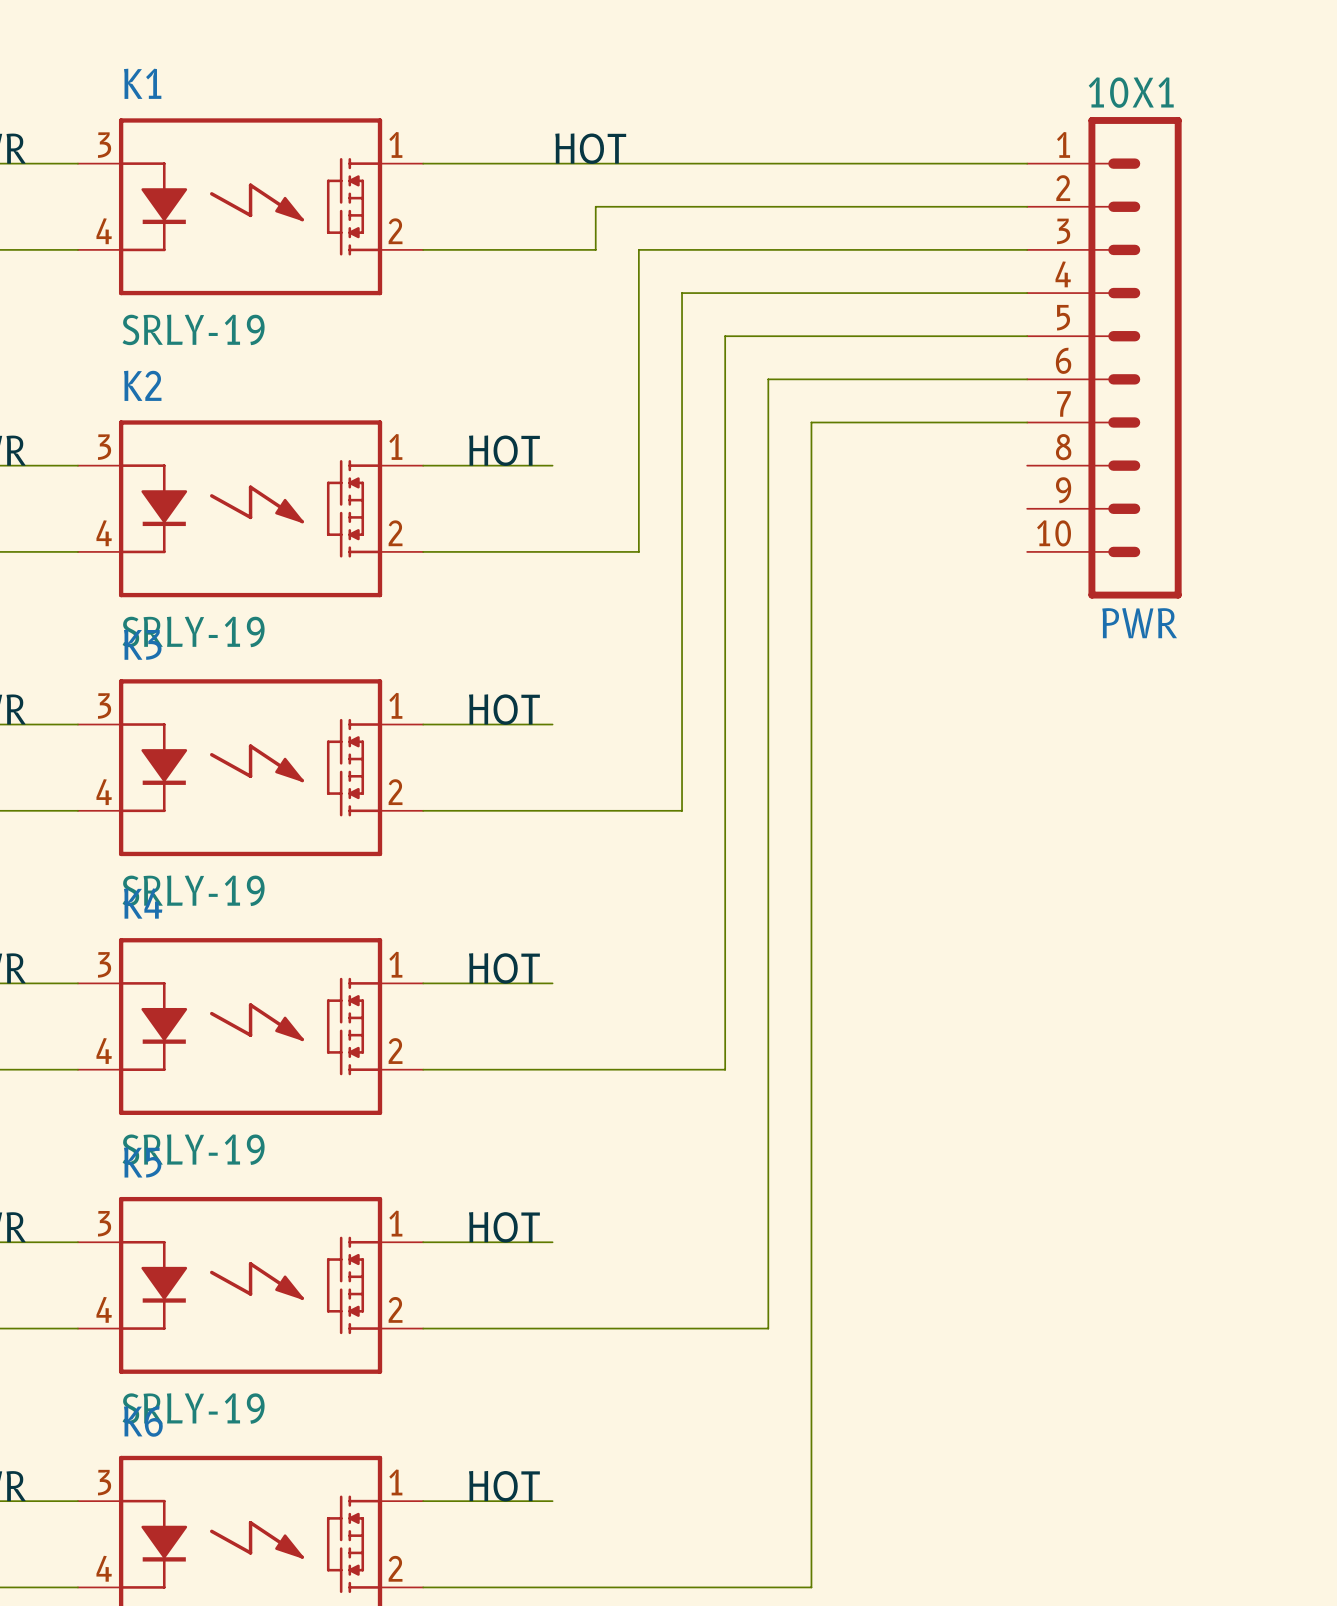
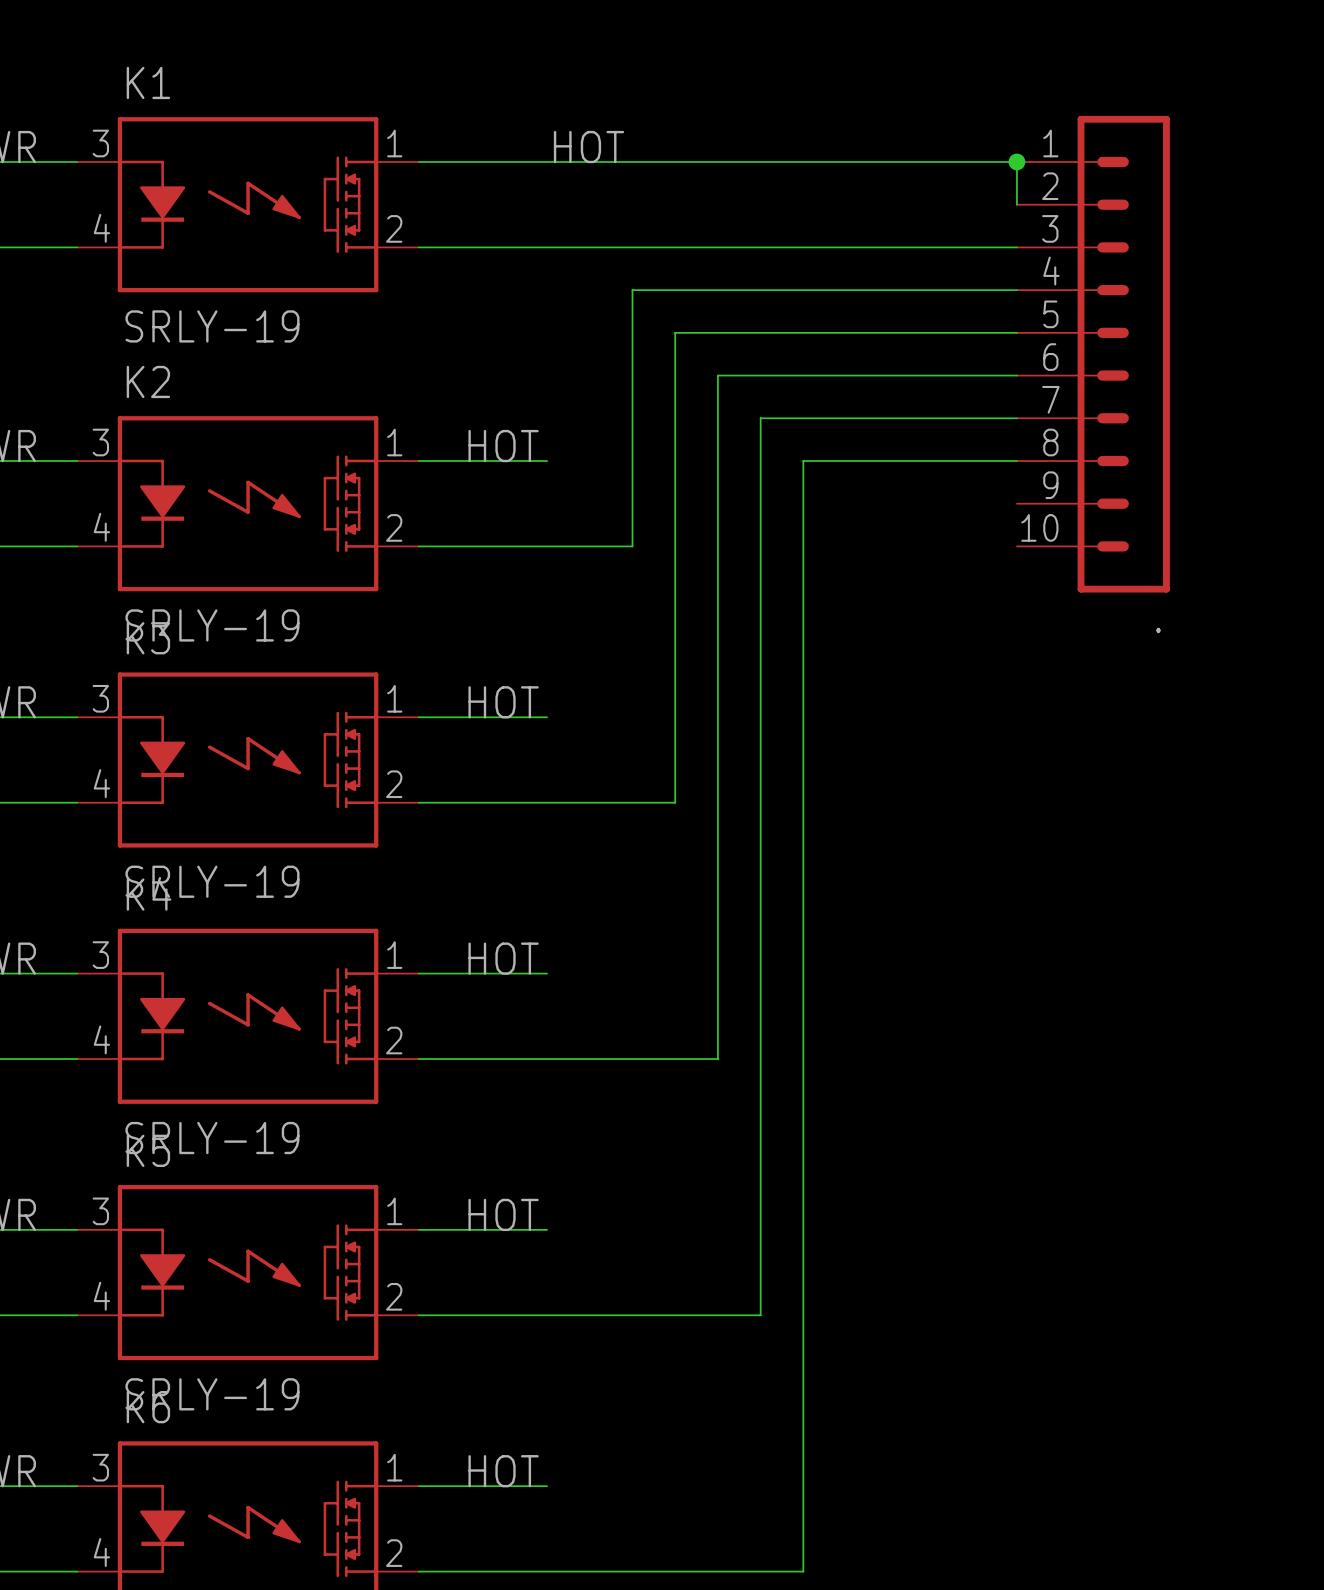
PWR value: 10X1 (1131, 92) -> none
junction: none -> (1016, 161)
wire: (1027, 206) (595, 206) (595, 249) -> (1016, 204) (1016, 161)
wire: (638, 249) (638, 293) -> (632, 247) (589, 247)
wire: none -> (632, 290) (675, 290)
wire: (682, 293) (682, 336) -> (717, 332) (675, 332)
wire: (725, 336) (725, 379) -> (760, 375) (717, 375)
wire: (768, 379) (768, 422) -> none
wire: (811, 422) (811, 465) -> (803, 418) (760, 418)
wire: none -> (803, 461) (1016, 461)
PWR name: PWR (1139, 623) -> . (1158, 630)

